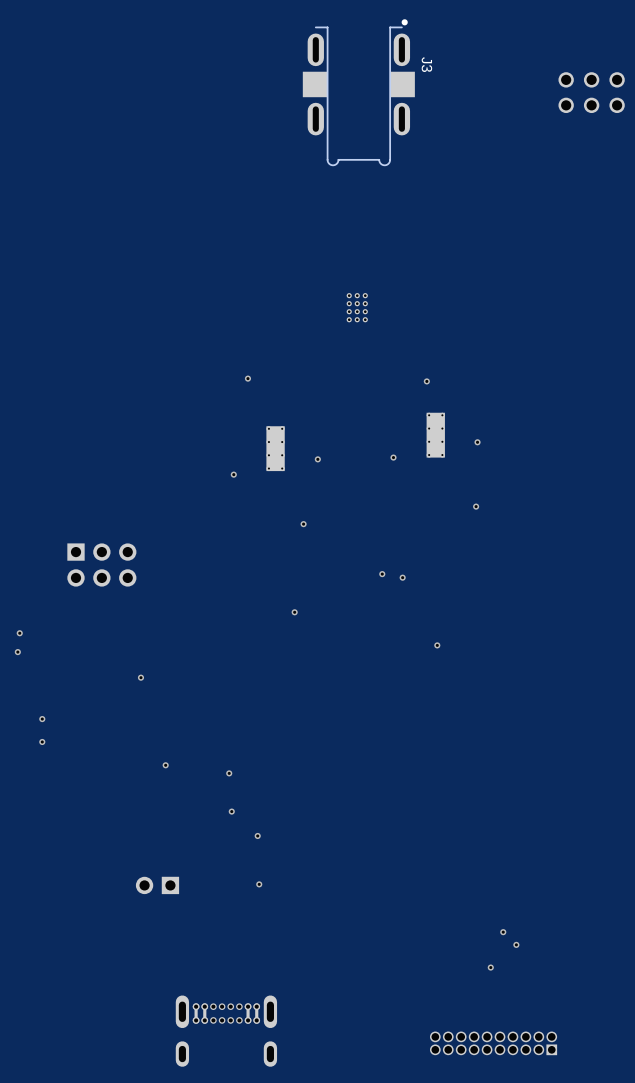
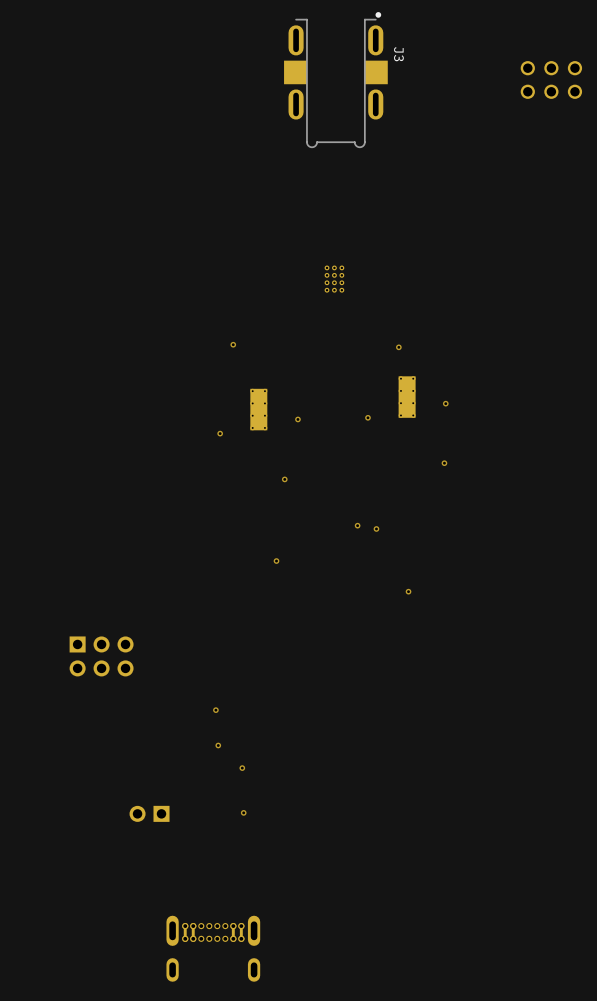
part position: (101, 565) -> (101, 656)
via: (19, 633) -> none
via: (17, 652) -> none
via: (140, 677) -> none
via: (42, 719) -> none
via: (42, 741) -> none
via: (165, 765) -> none
via: (503, 932) -> none
via: (516, 944) -> none
via: (490, 967) -> none
part: (493, 1043) -> none

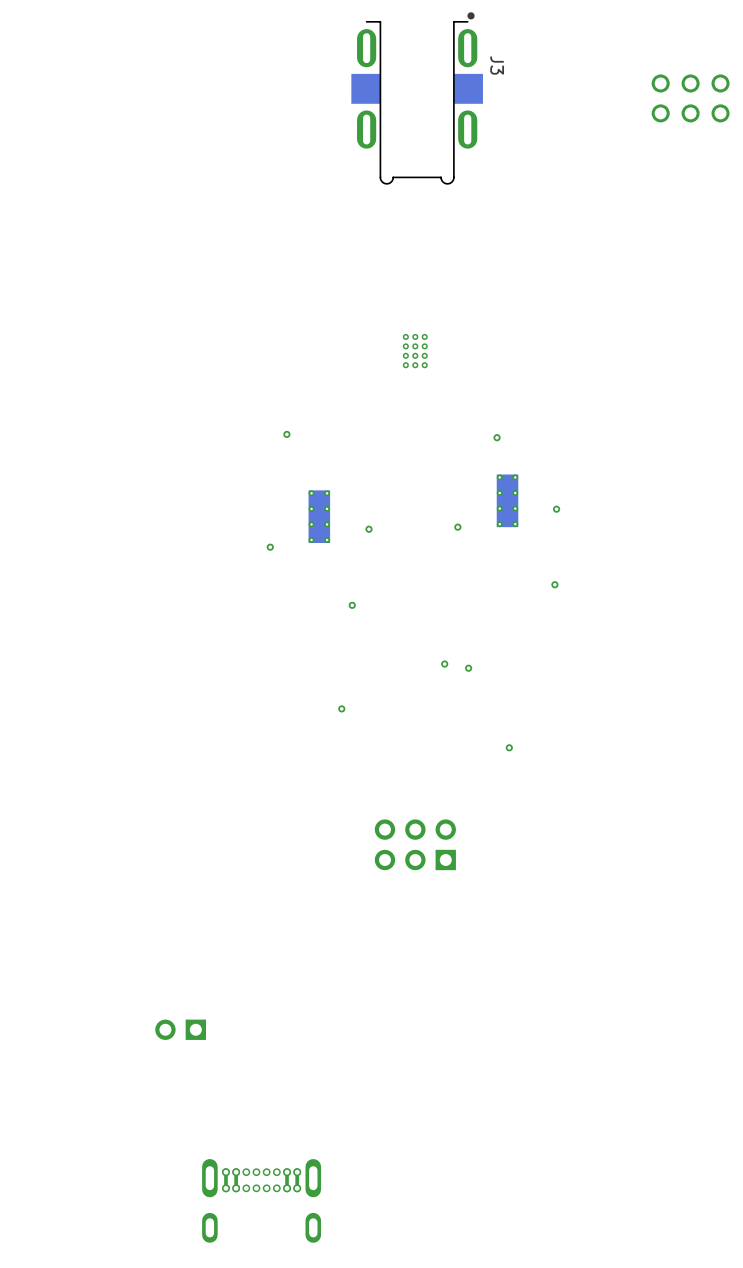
part rotation: 0° (101, 656) -> 180° (415, 844)
part position: (101, 656) -> (415, 844)
via: (215, 710) -> none
via: (218, 745) -> none
via: (242, 768) -> none
via: (243, 812) -> none

